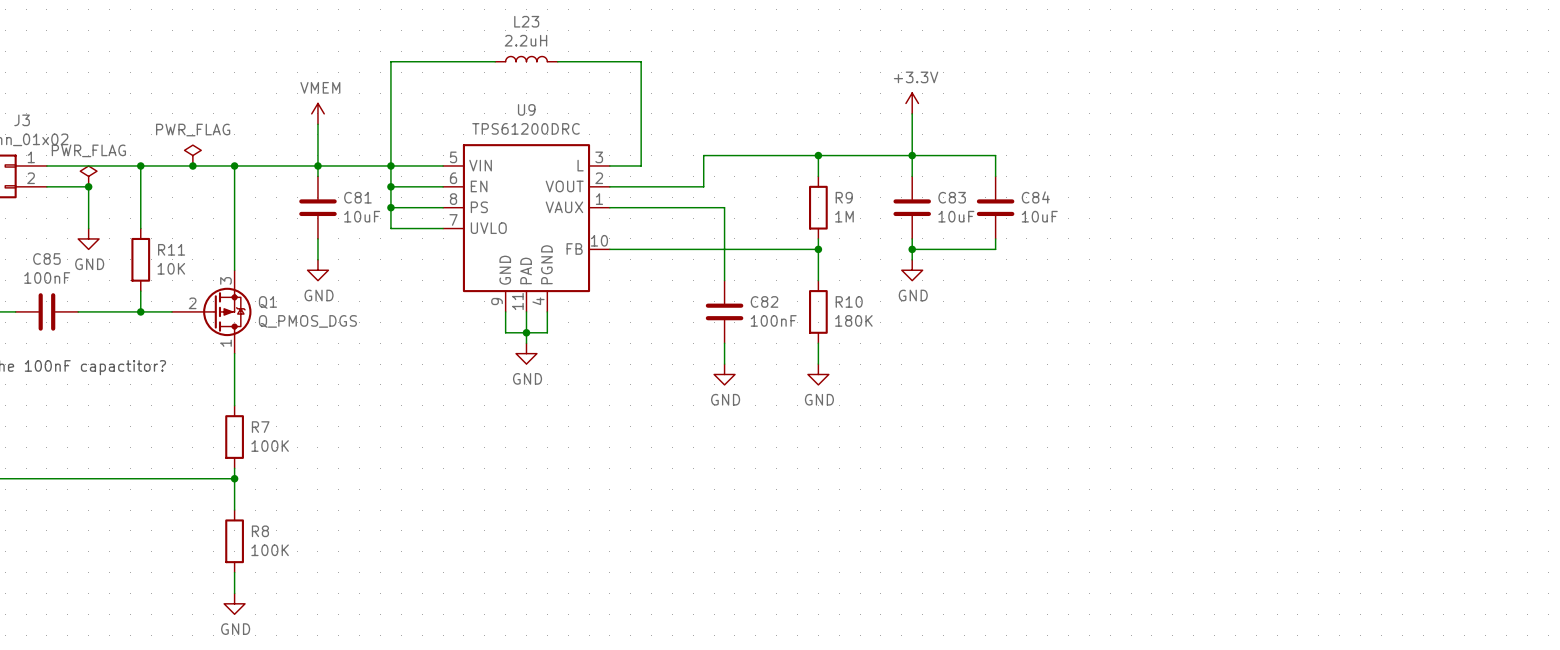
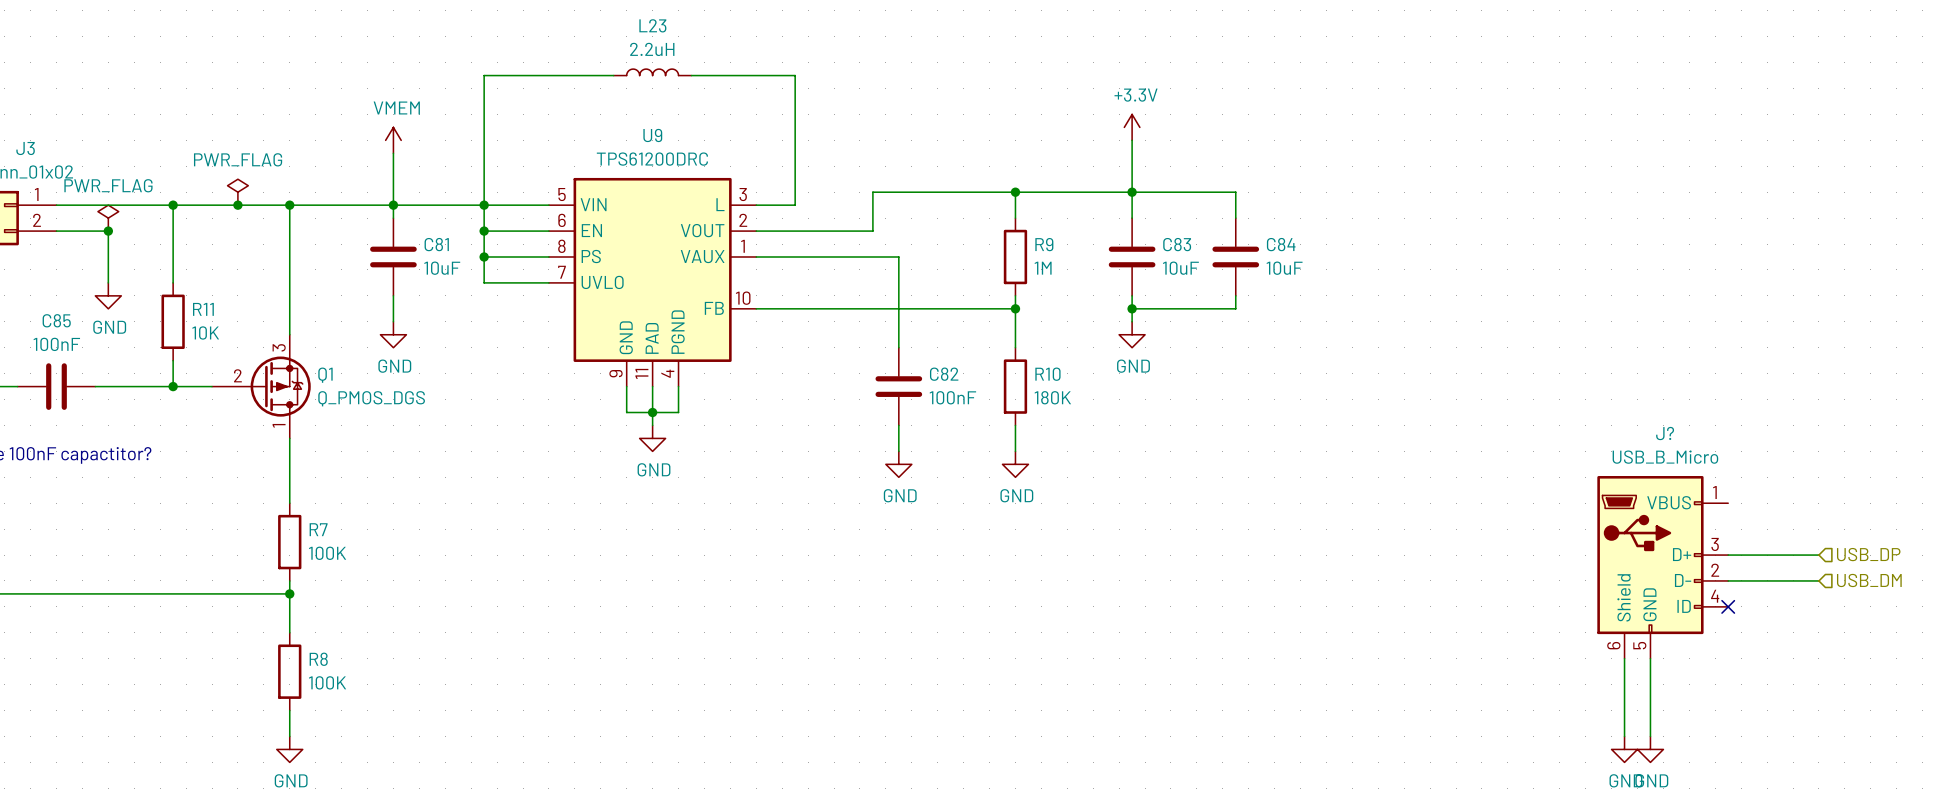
wire: none -> (1728, 555) (1818, 555)
hierarchical label: none -> USB_DP (1868, 554)
J?: none -> USB_B_Micro (1662, 567)
wire: none -> (1728, 580) (1818, 580)
hierarchical label: none -> USB_DM (1869, 580)
no-connect mark: none -> (1728, 606)
wire: none -> (1624, 658) (1624, 736)
wire: none -> (1650, 658) (1650, 736)
power symbol: none -> GND (1624, 749)
power symbol: none -> GND (1650, 749)

